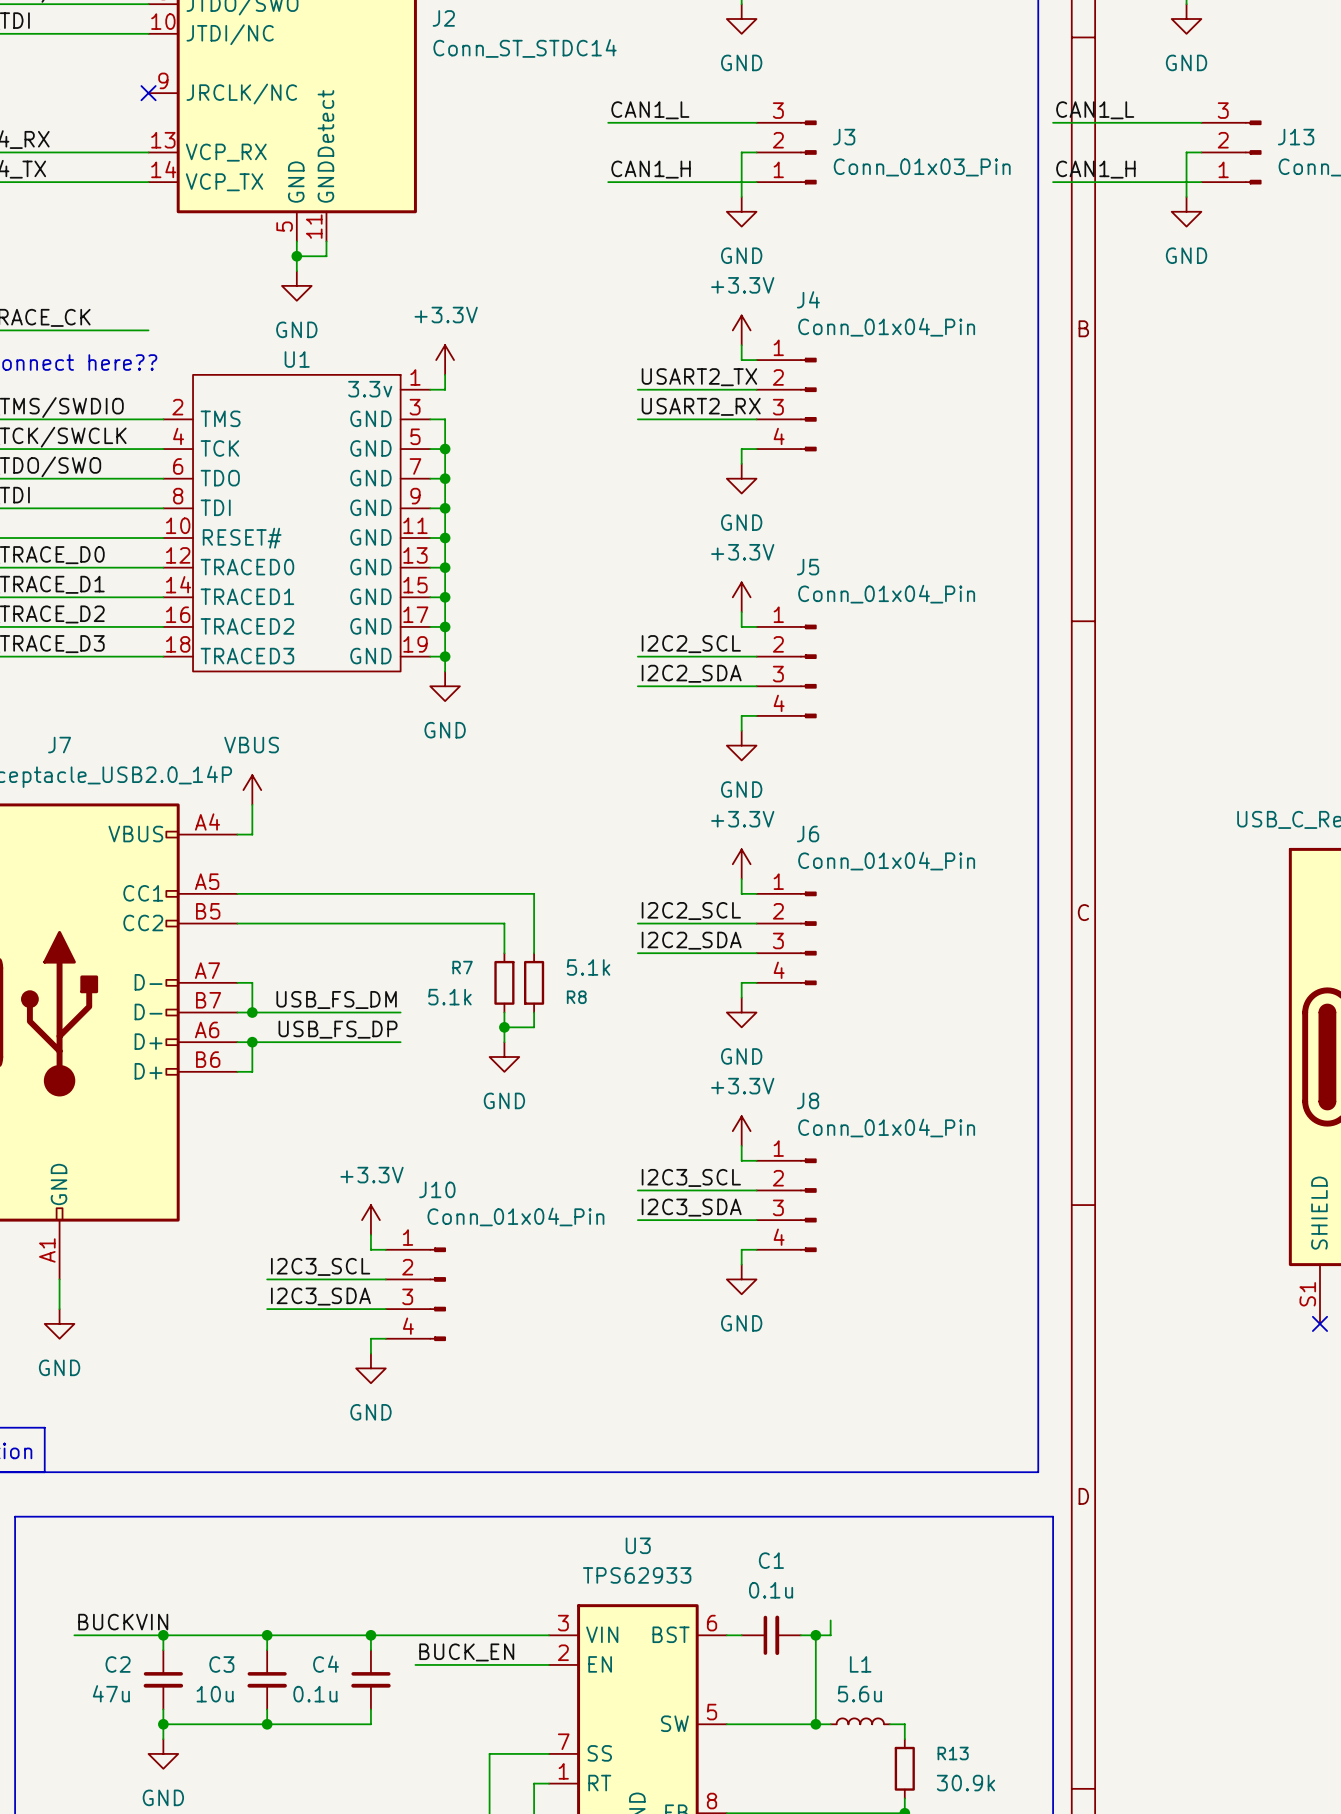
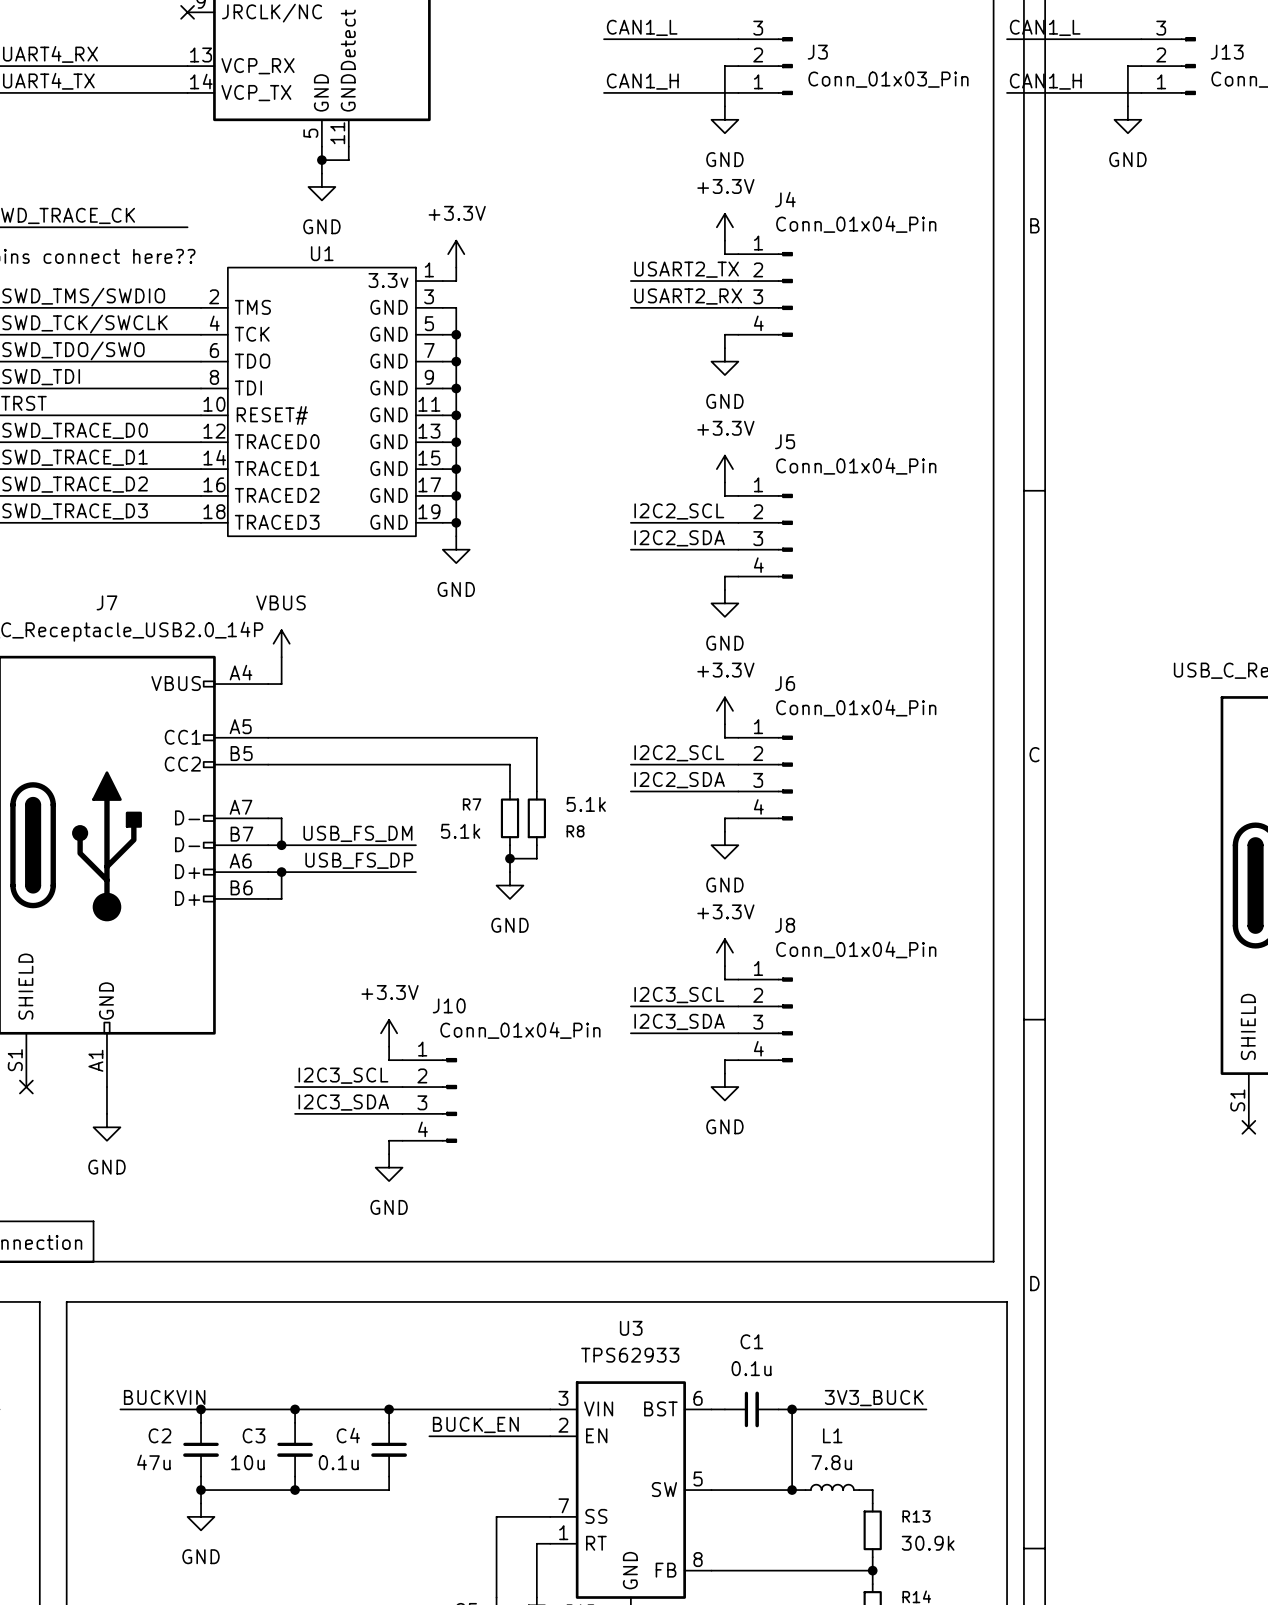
wire: (830, 1620) (830, 1635) -> (926, 1409) (805, 1409)
label: none -> 3V3_BUCK (874, 1398)
L1 value: 5.6u (859, 1694) -> 7.8u (831, 1462)

